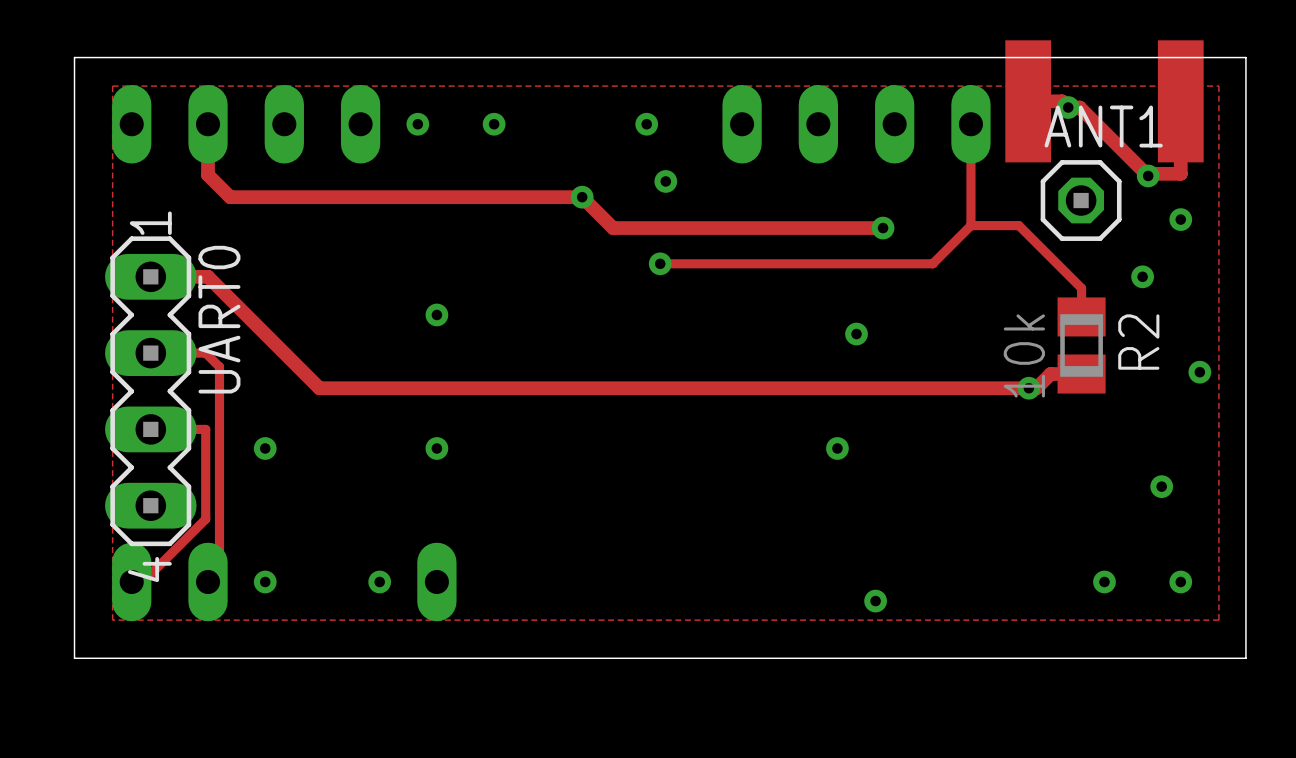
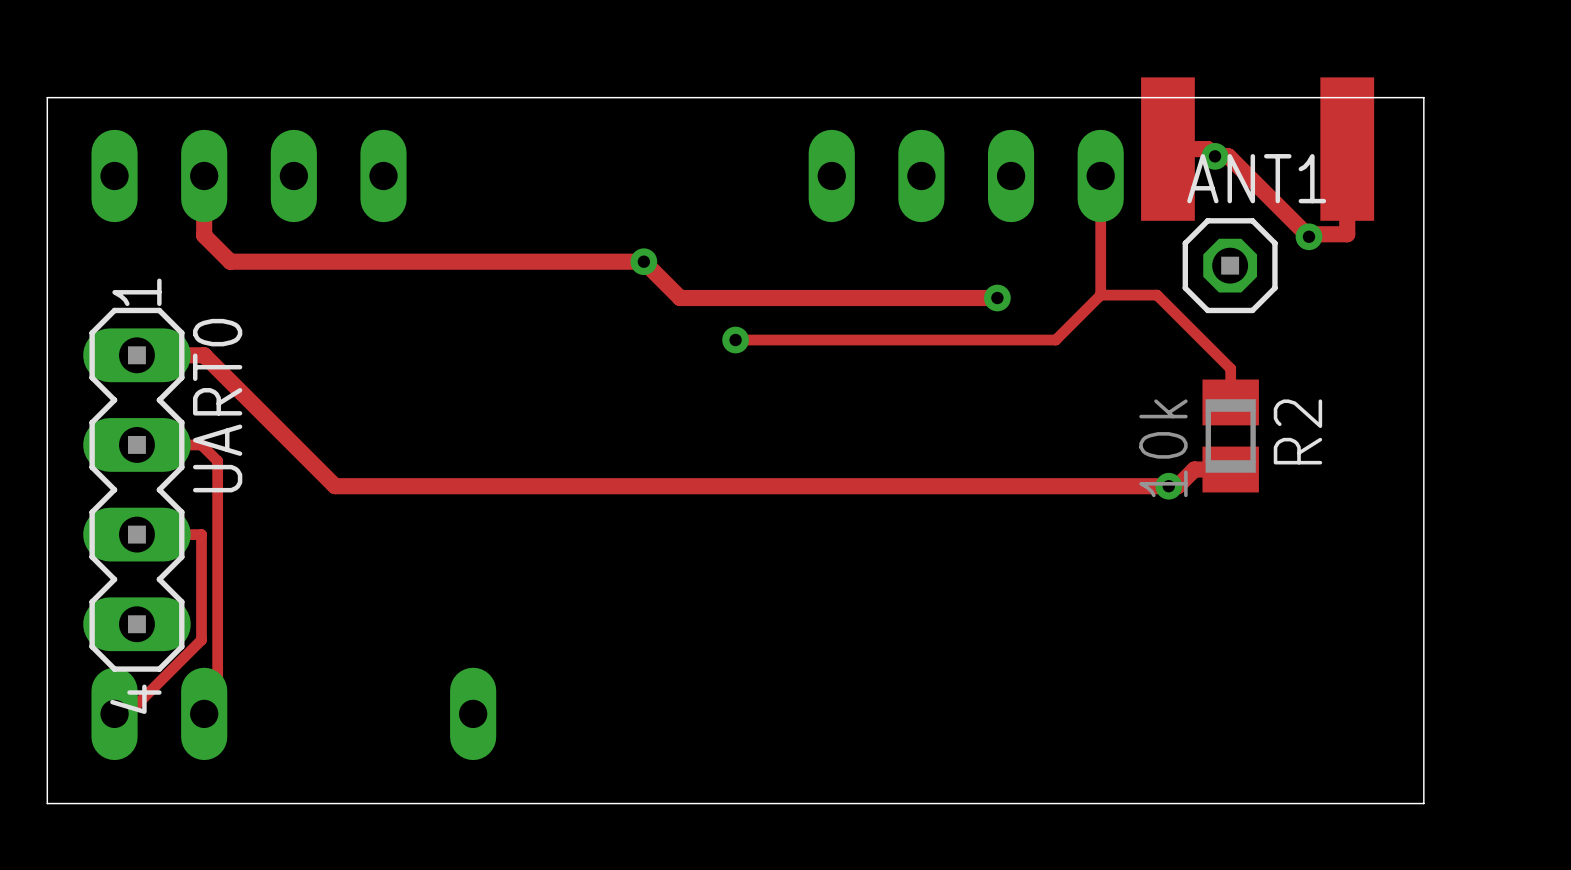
zone outline: (112, 86) (112, 620) (1218, 620) (1218, 86) (112, 86) -> none
via: (417, 124) -> none
via: (494, 124) -> none
via: (646, 124) -> none
via: (665, 181) -> none
via: (1180, 219) -> none
via: (1142, 276) -> none
via: (436, 314) -> none
via: (856, 334) -> none
via: (1199, 372) -> none
via: (265, 448) -> none
via: (436, 448) -> none
via: (837, 448) -> none
via: (1161, 486) -> none
via: (265, 581) -> none
via: (379, 581) -> none
via: (1104, 581) -> none
via: (1180, 581) -> none
via: (875, 601) -> none

